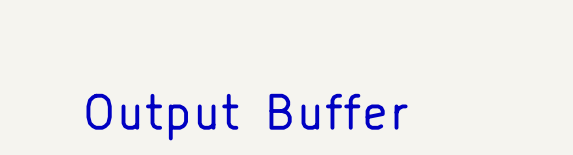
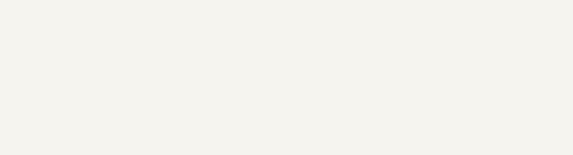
text: Output Buffer (247, 117) -> none

